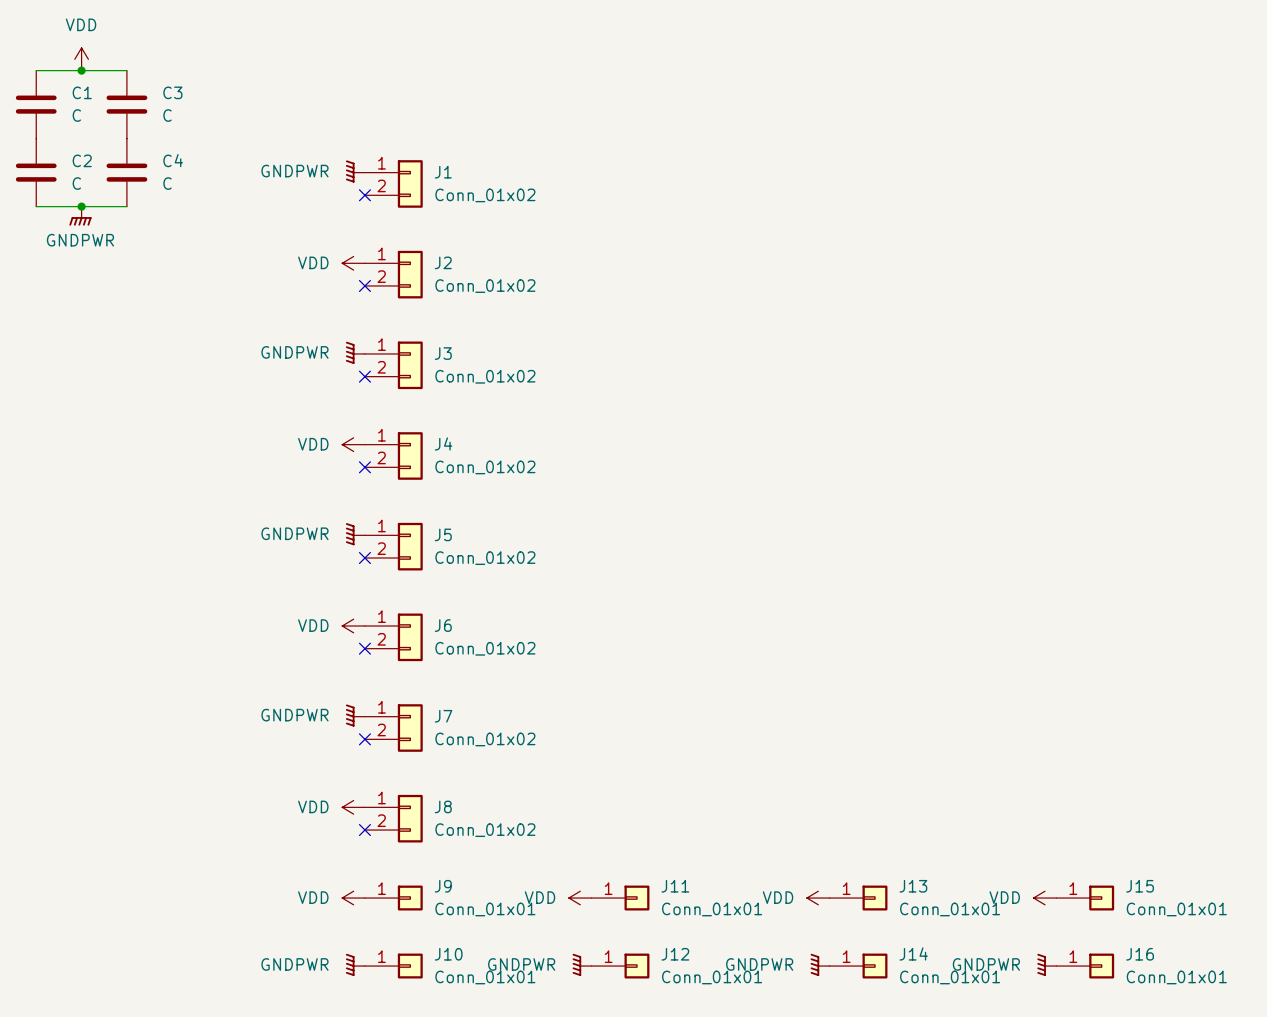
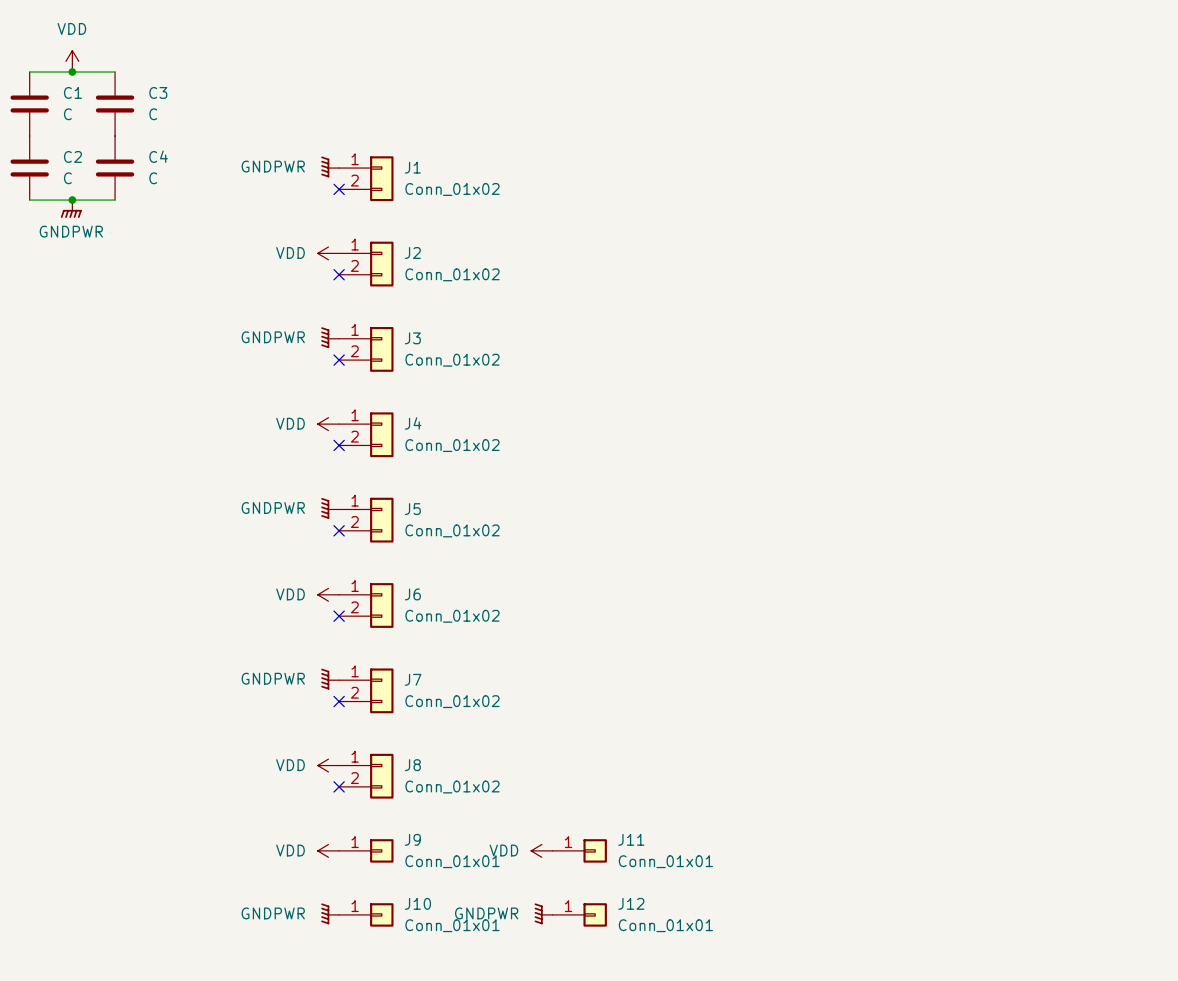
power symbol: VDD (818, 898) -> none
J13: Conn_01x01 (858, 898) -> none
power symbol: VDD (1045, 898) -> none
J15: Conn_01x01 (1085, 898) -> none
power symbol: GNDPWR (820, 964) -> none
power symbol: GNDPWR (1046, 964) -> none
J14: Conn_01x01 (858, 966) -> none
J16: Conn_01x01 (1085, 966) -> none

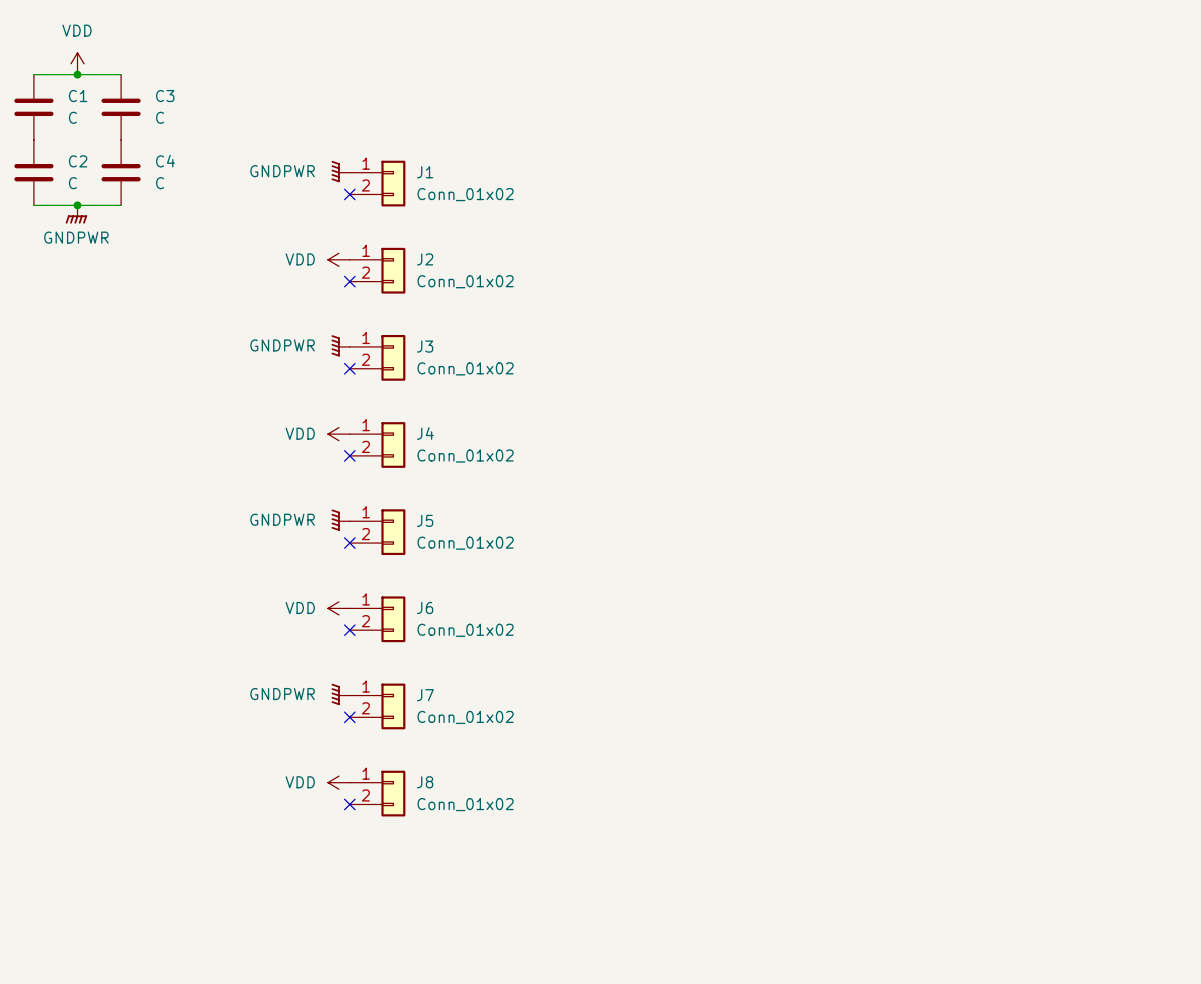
power symbol: VDD (328, 850) -> none
J9: Conn_01x01 (366, 850) -> none
power symbol: VDD (541, 850) -> none
J11: Conn_01x01 (579, 850) -> none
power symbol: GNDPWR (330, 913) -> none
power symbol: GNDPWR (543, 913) -> none
J10: Conn_01x01 (366, 914) -> none
J12: Conn_01x01 (579, 914) -> none

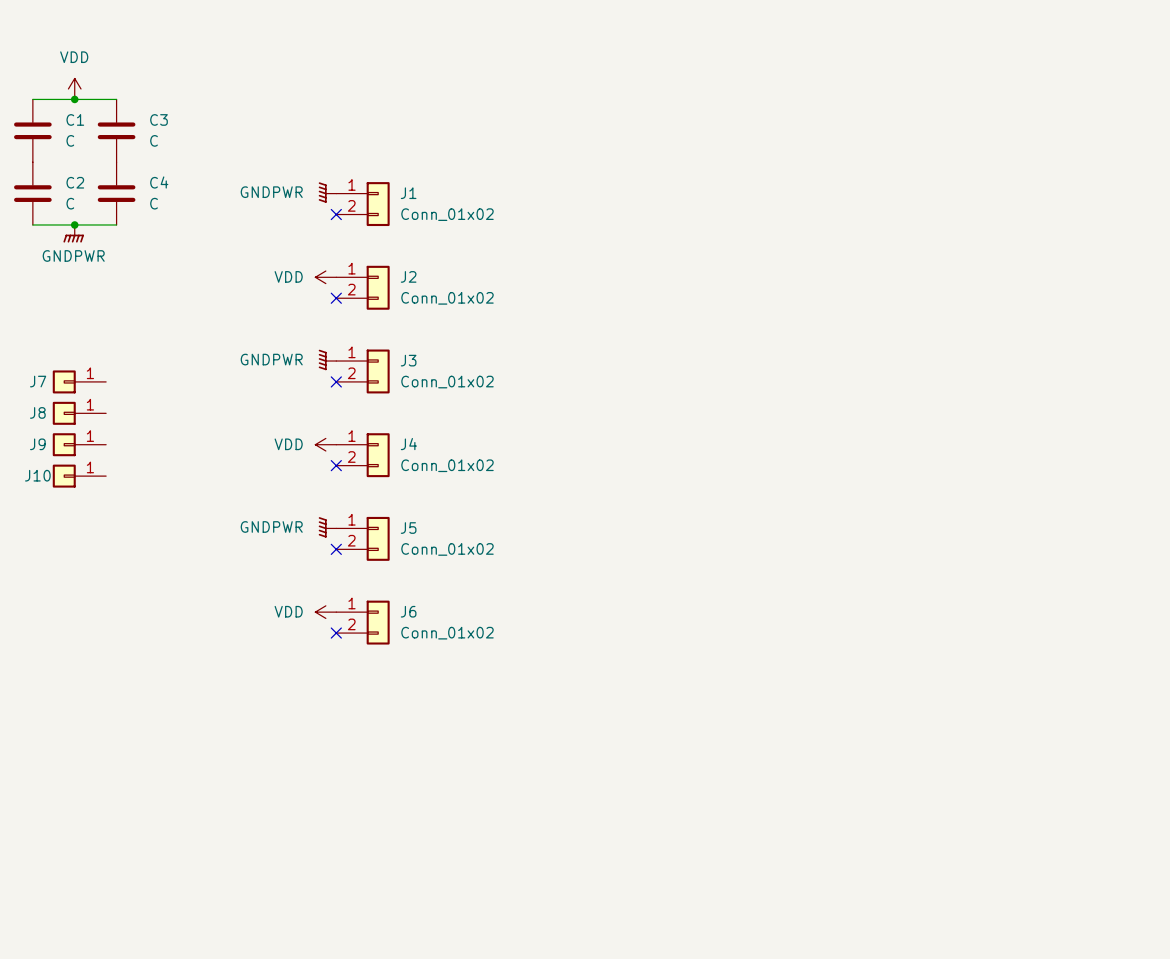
J9: none -> (79, 444)
J10: none -> (79, 476)
J7 symbol: [349, 683, 406, 730] -> [52, 370, 107, 394]
power symbol: GNDPWR (340, 694) -> none
J7 name position: J7 (425, 695) -> J7 (38, 381)
no-connect mark: (349, 717) -> none
J7 value: Conn_01x02 (465, 717) -> none
J8 symbol: [349, 770, 406, 817] -> [52, 401, 107, 425]
power symbol: VDD (338, 782) -> none
J8 name position: J8 (425, 782) -> J8 (37, 412)
no-connect mark: (349, 804) -> none
J8 value: Conn_01x02 (465, 804) -> none

